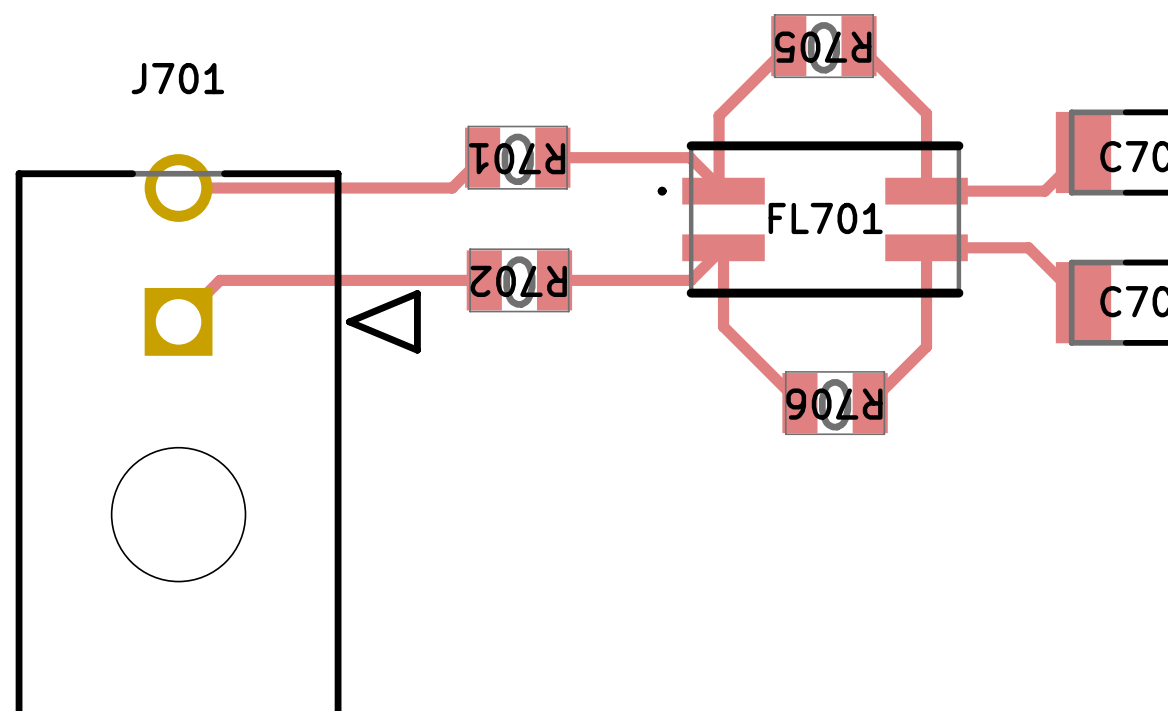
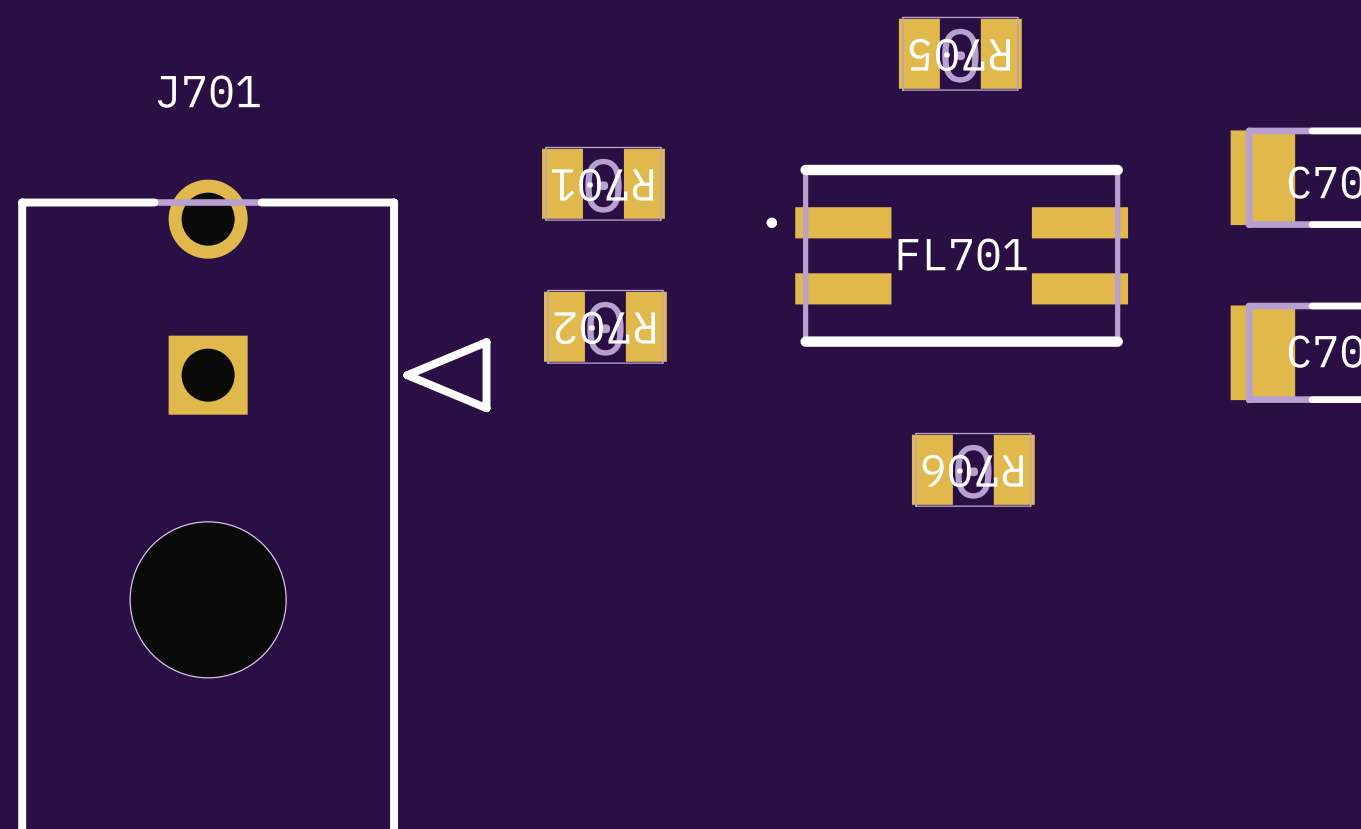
track: (788, 46) (719, 115) (719, 186) -> none
track: (859, 46) (926, 113) (926, 191) (1044, 191) (1083, 152) -> none
track: (482, 157) (452, 188) (178, 188) -> none
track: (552, 157) (690, 157) (723, 191) -> none
track: (484, 280) (220, 280) (178, 321) -> none
track: (554, 280) (690, 280) (723, 247) (723, 326) (799, 403) -> none
track: (1083, 302) (1028, 247) (926, 247) (926, 346) (870, 403) -> none

